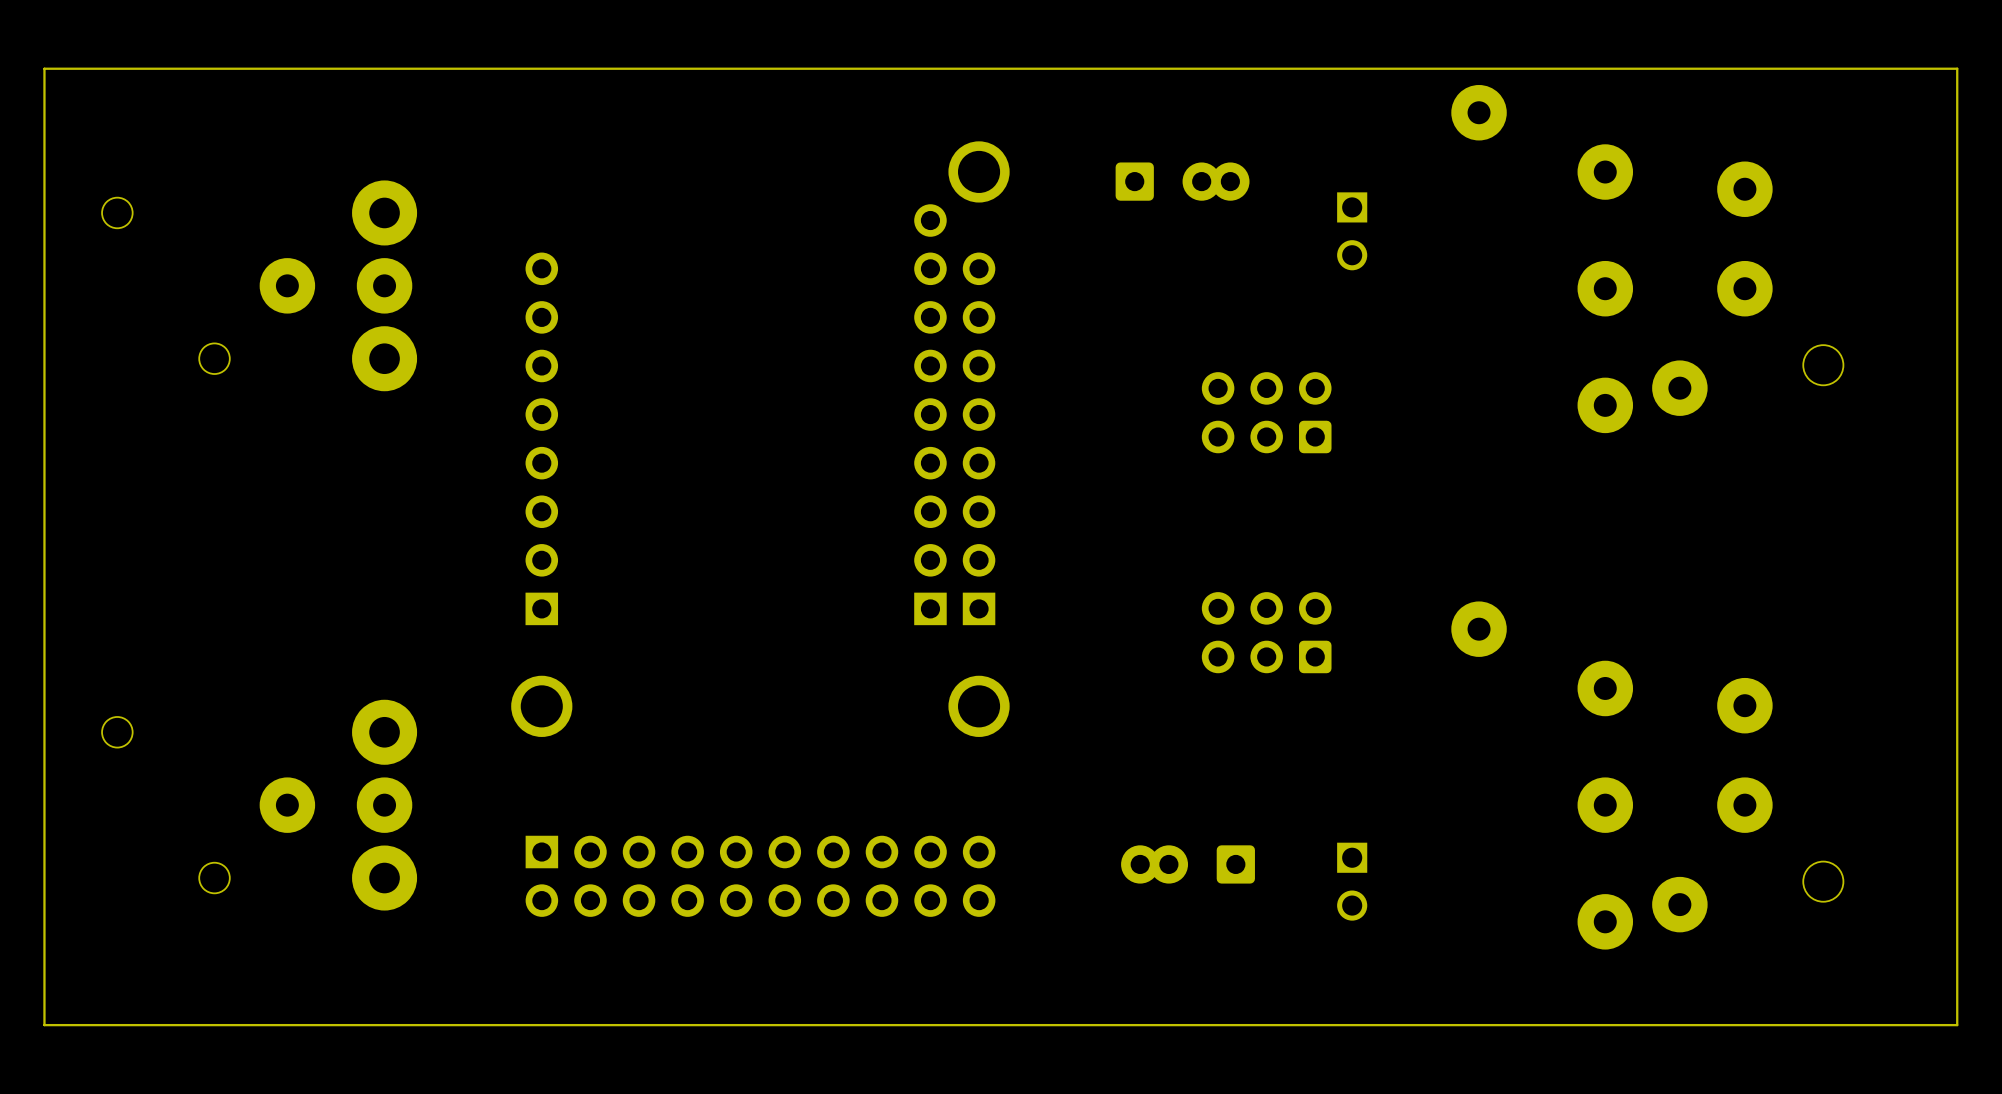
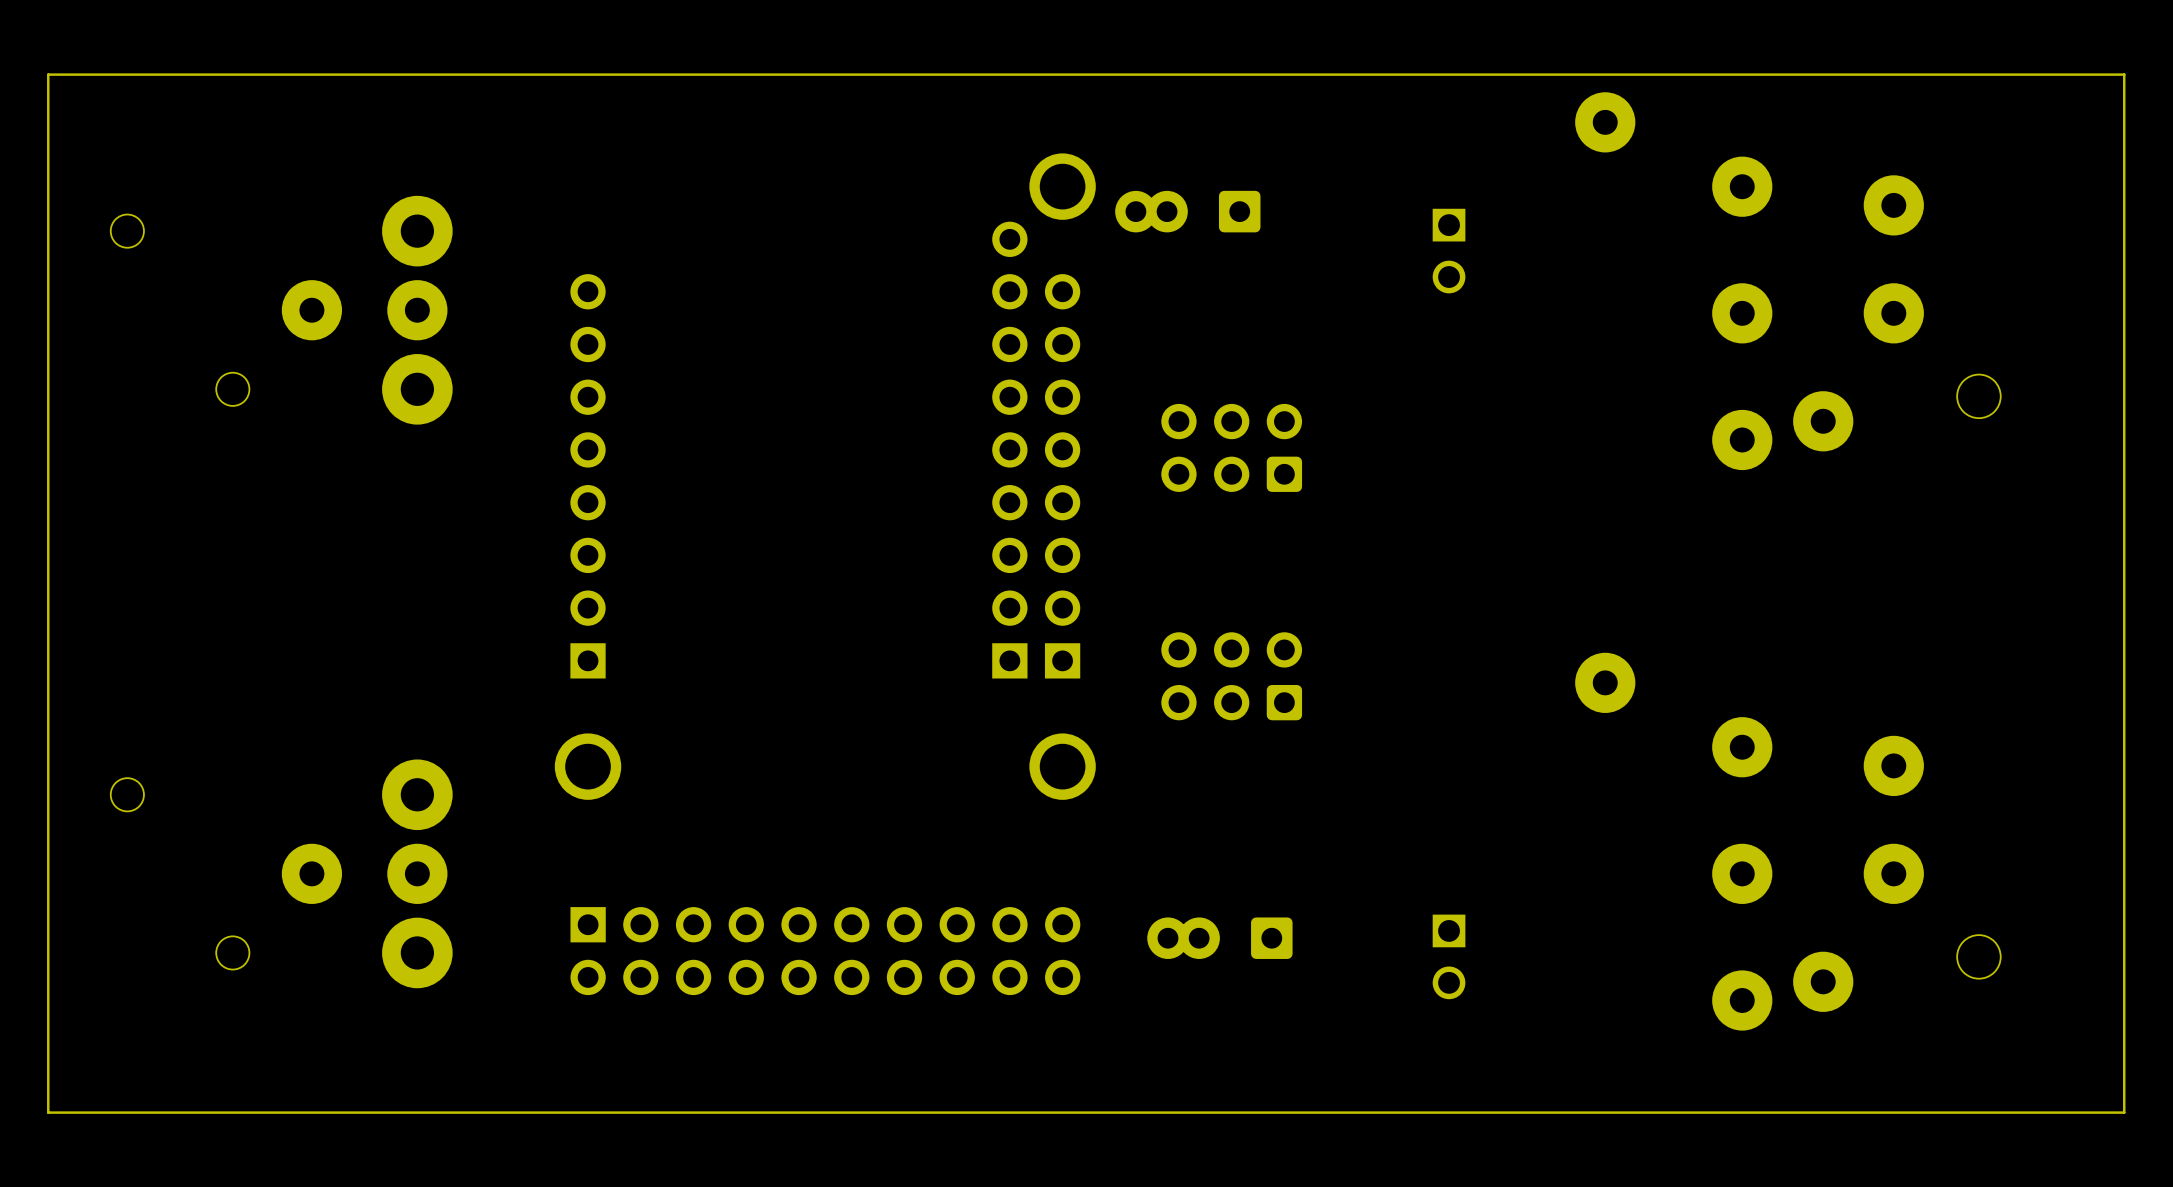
part rotation: 0° (1182, 181) -> 180° (1187, 211)
part position: (1182, 181) -> (1187, 211)
part position: (1352, 231) -> (1449, 251)
part: none -> (1231, 447)
part: (1266, 412) -> none
part: none -> (1231, 676)
part: (1266, 632) -> none
part position: (1188, 864) -> (1219, 938)
part position: (1352, 881) -> (1449, 956)

